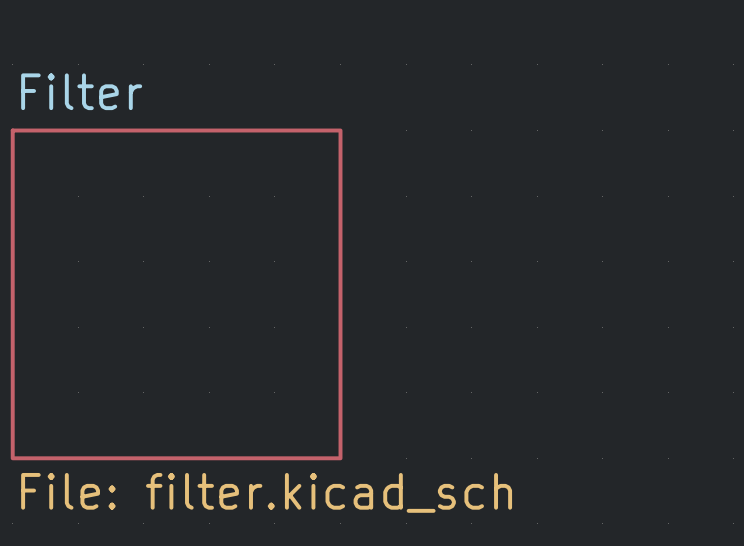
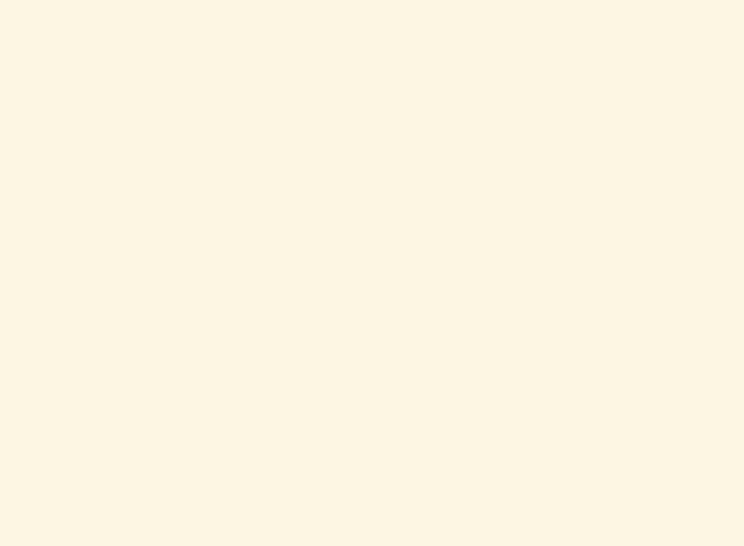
sheet Filter: File: filter.kicad_sch (176, 294) -> none

